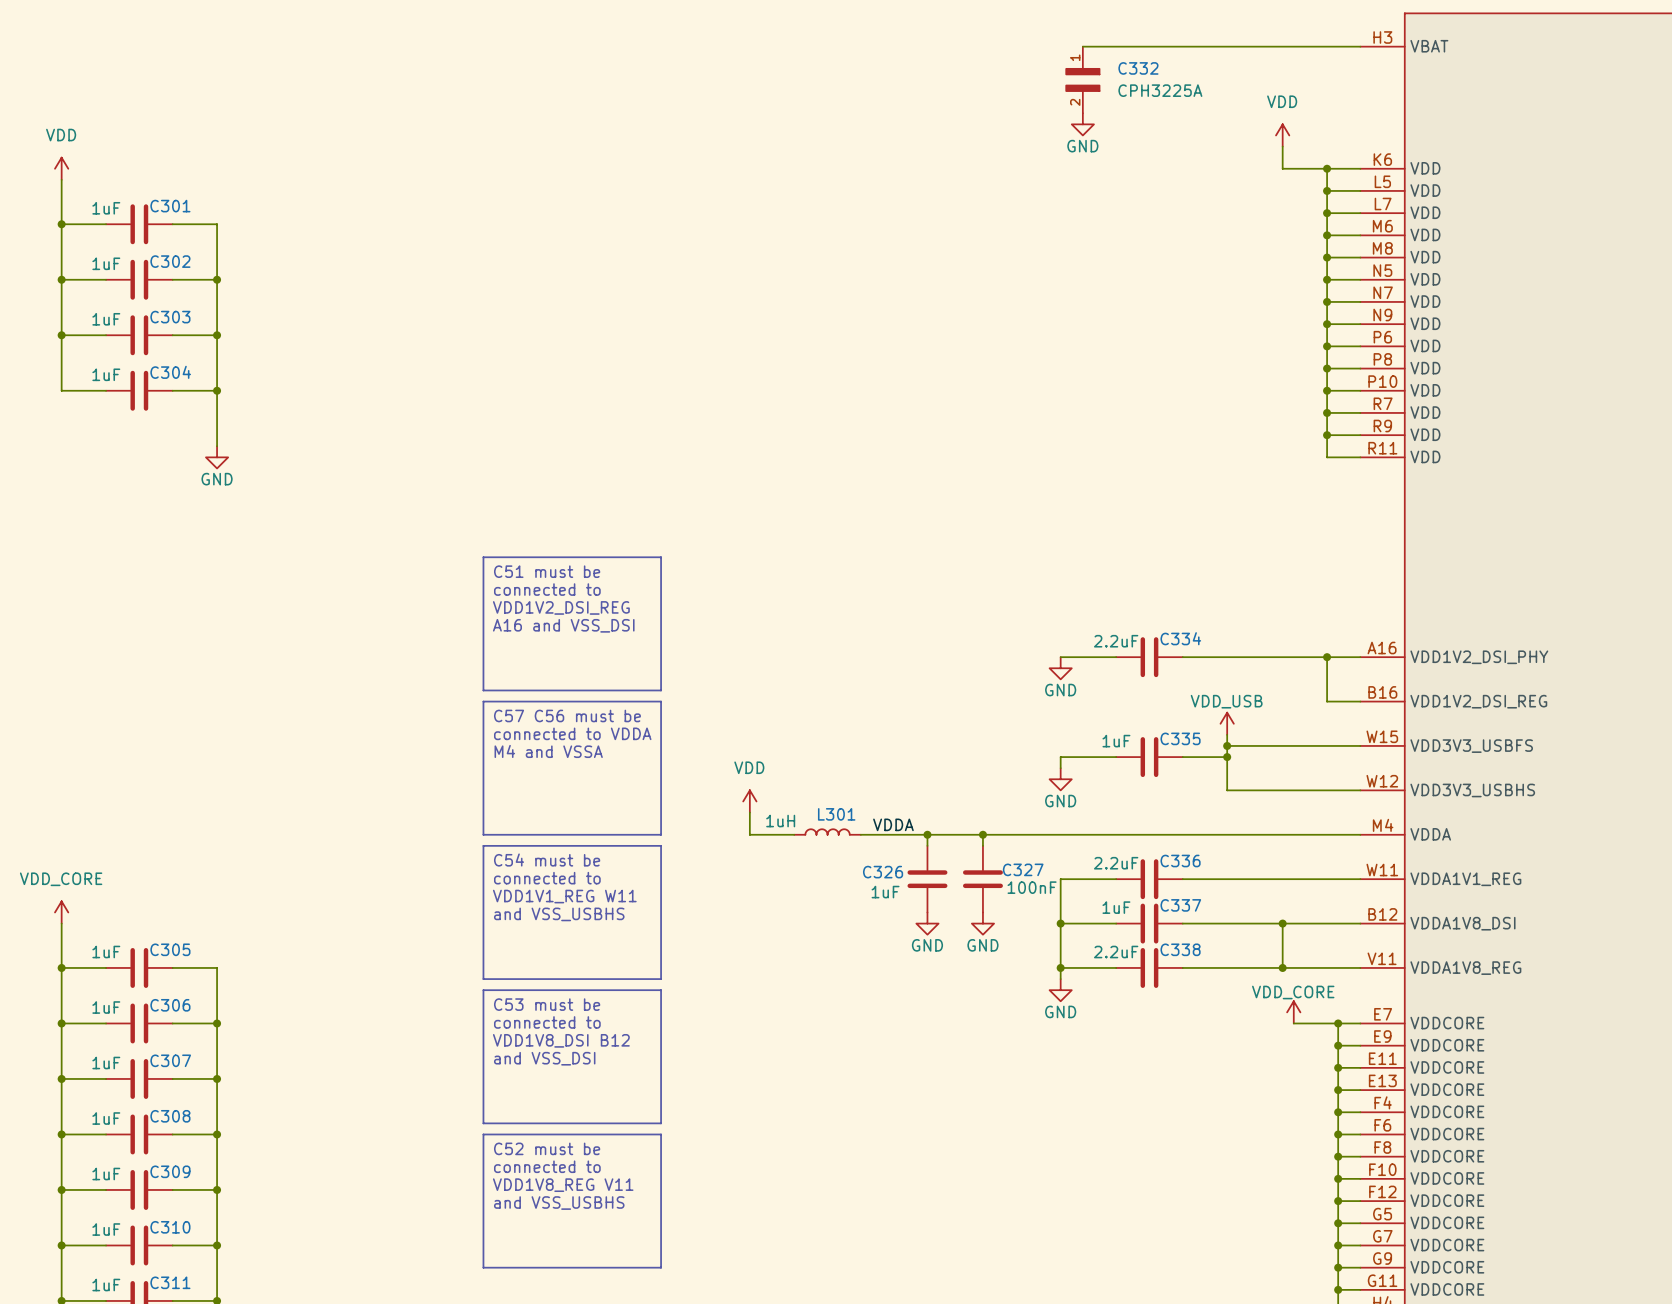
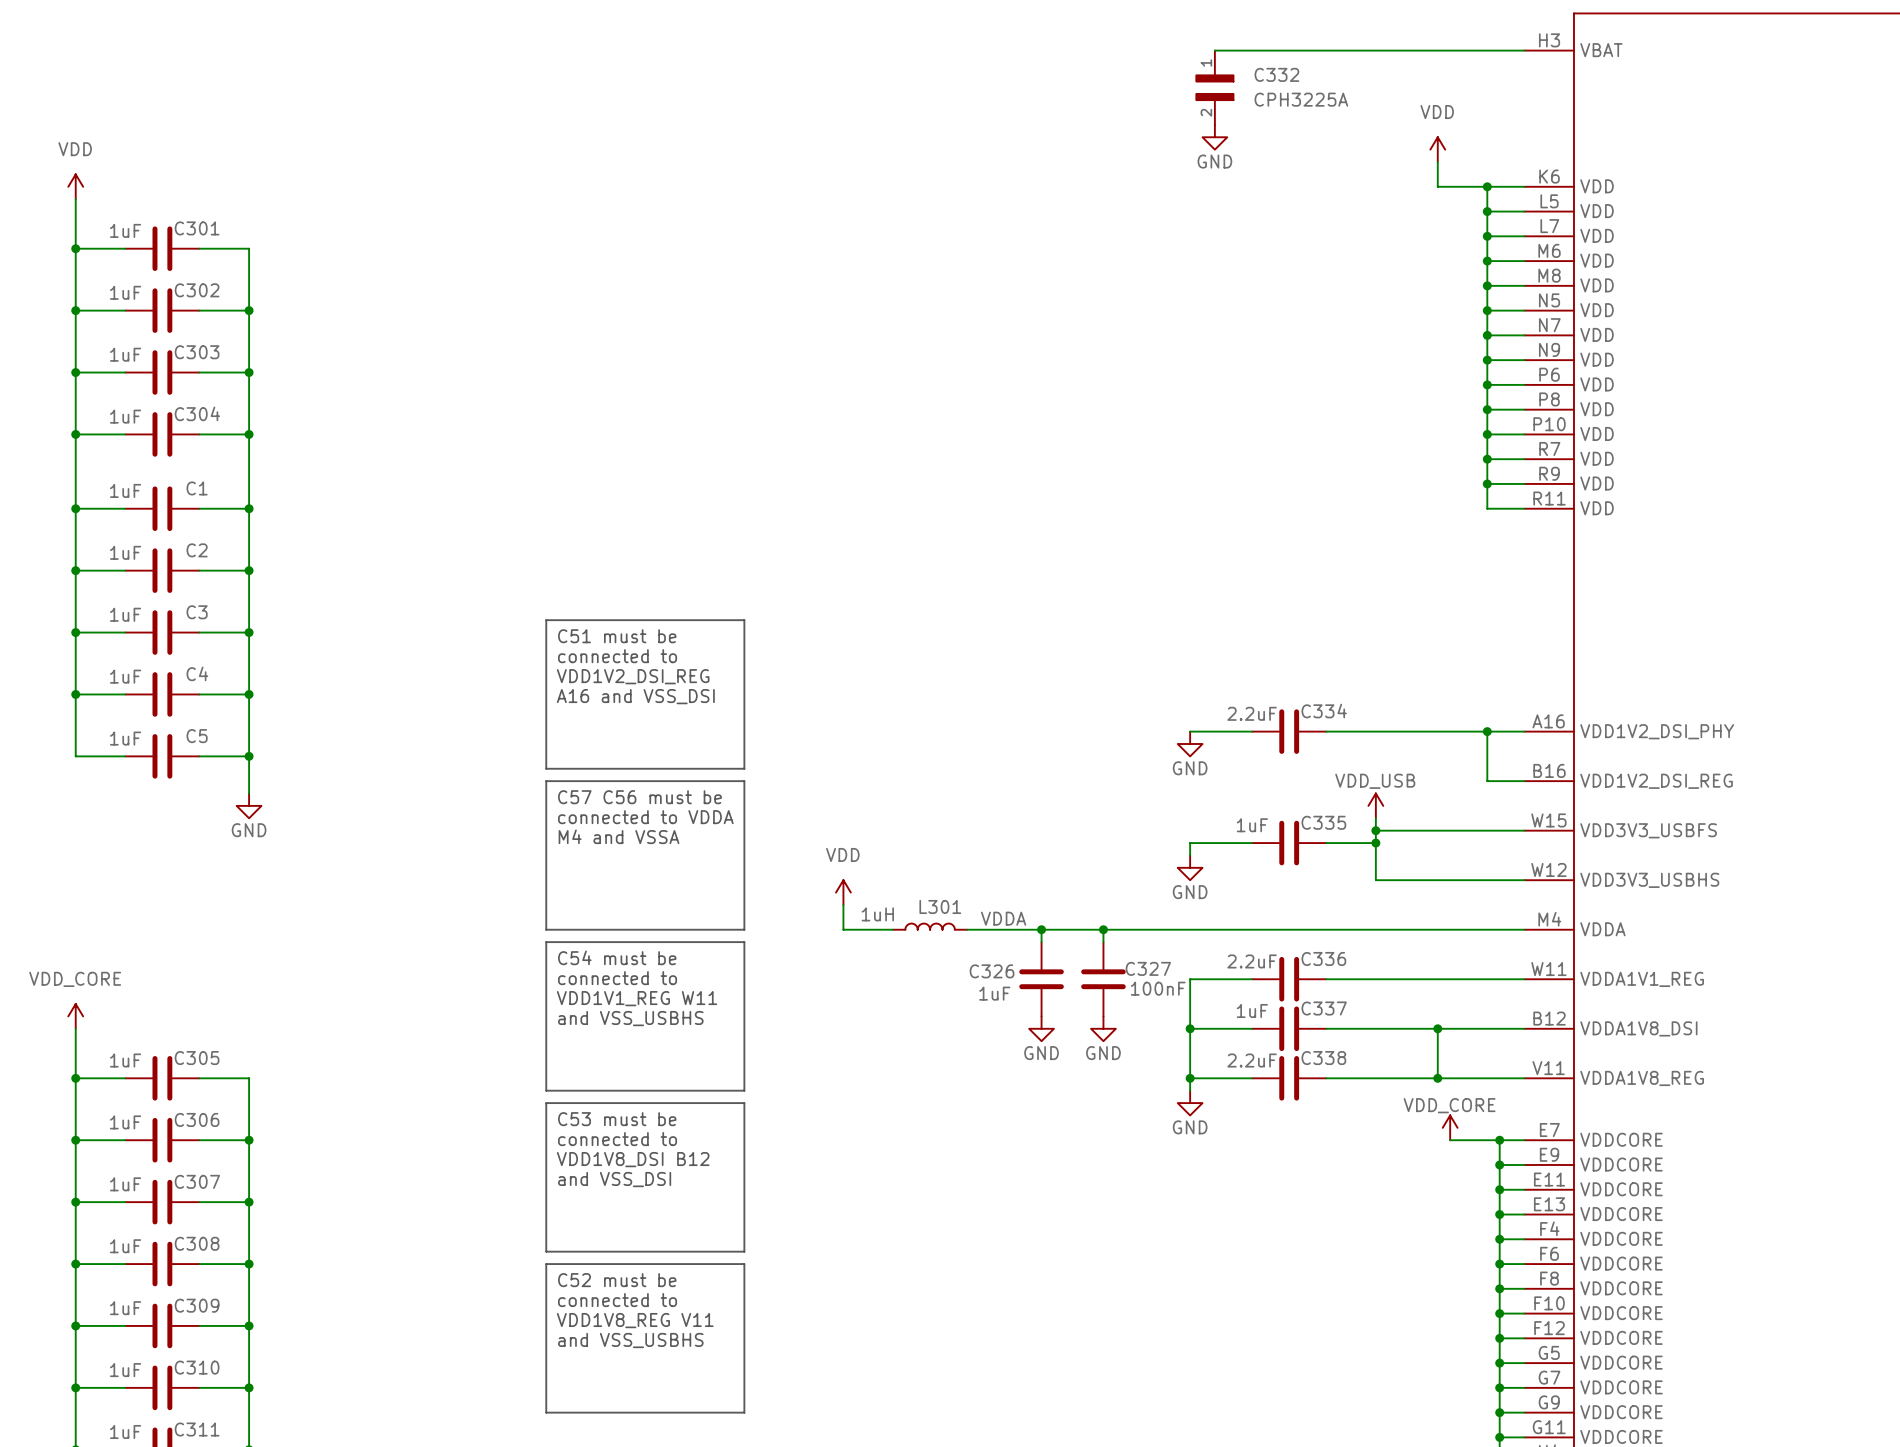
wire: none -> (75, 434) (75, 756) (125, 756)
junction: none -> (75, 434)
wire: none -> (249, 496) (249, 793)
wire: none -> (75, 508) (125, 508)
junction: none -> (75, 508)
C1: none -> 1uF (162, 508)
wire: none -> (199, 508) (249, 508)
power symbol: GND (217, 457) -> none
junction: none -> (249, 508)
wire: none -> (75, 570) (125, 570)
junction: none -> (75, 570)
C2: none -> 1uF (162, 570)
wire: none -> (199, 570) (249, 570)
junction: none -> (249, 570)
wire: none -> (75, 632) (125, 632)
junction: none -> (75, 632)
C3: none -> 1uF (162, 632)
wire: none -> (199, 632) (249, 632)
junction: none -> (249, 632)
wire: none -> (75, 694) (125, 694)
junction: none -> (75, 694)
C4: none -> 1uF (162, 694)
wire: none -> (199, 694) (249, 694)
junction: none -> (249, 694)
C5: none -> 1uF (162, 756)
wire: none -> (199, 756) (249, 756)
junction: none -> (249, 756)
power symbol: none -> GND (249, 805)

